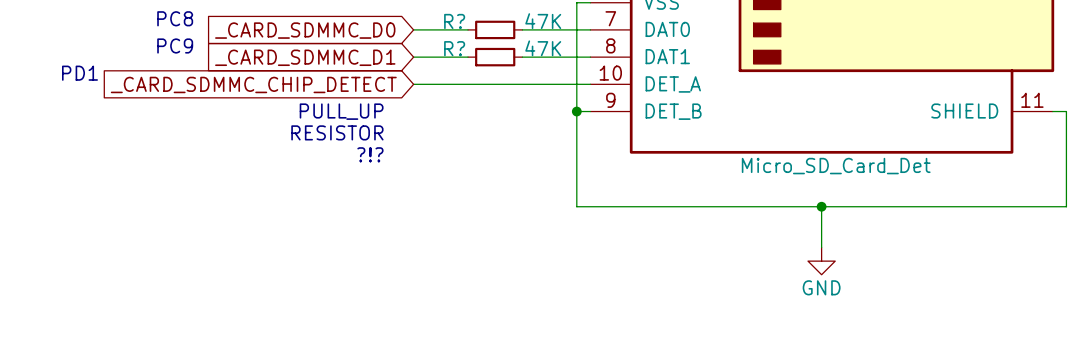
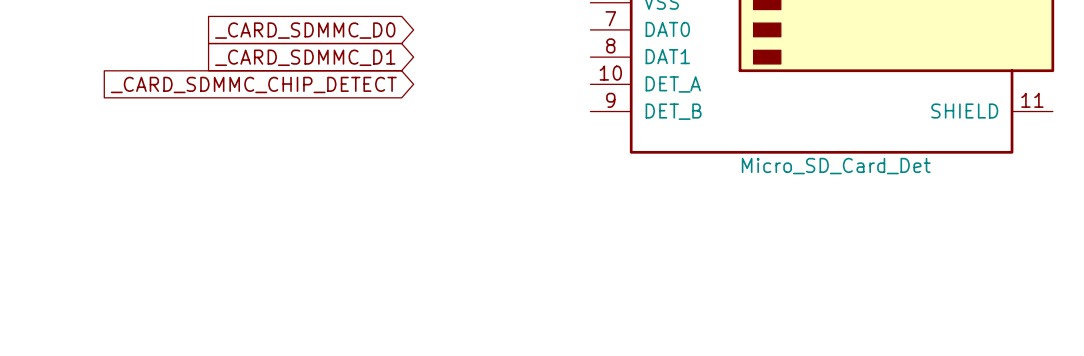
wire: (590, 2) (576, 2) (576, 206) (1066, 206) (1066, 111) (1052, 111) -> none
text: PC8 (175, 18) -> none
wire: (413, 29) (468, 29) -> none
R?: 47K (495, 29) -> none
wire: (522, 29) (590, 29) -> none
text: PC9 (175, 45) -> none
wire: (413, 57) (468, 57) -> none
R?: 47K (495, 57) -> none
wire: (522, 57) (590, 57) -> none
text: PD1 (79, 73) -> none
wire: (413, 84) (590, 84) -> none
text: PULL_UP (341, 111) -> none
wire: (576, 111) (590, 111) -> none
junction: (576, 111) -> none
text: RESISTOR (337, 132) -> none
text: ?!? (370, 154) -> none
wire: (821, 206) (821, 247) -> none
junction: (821, 206) -> none
power symbol: GND (821, 261) -> none

